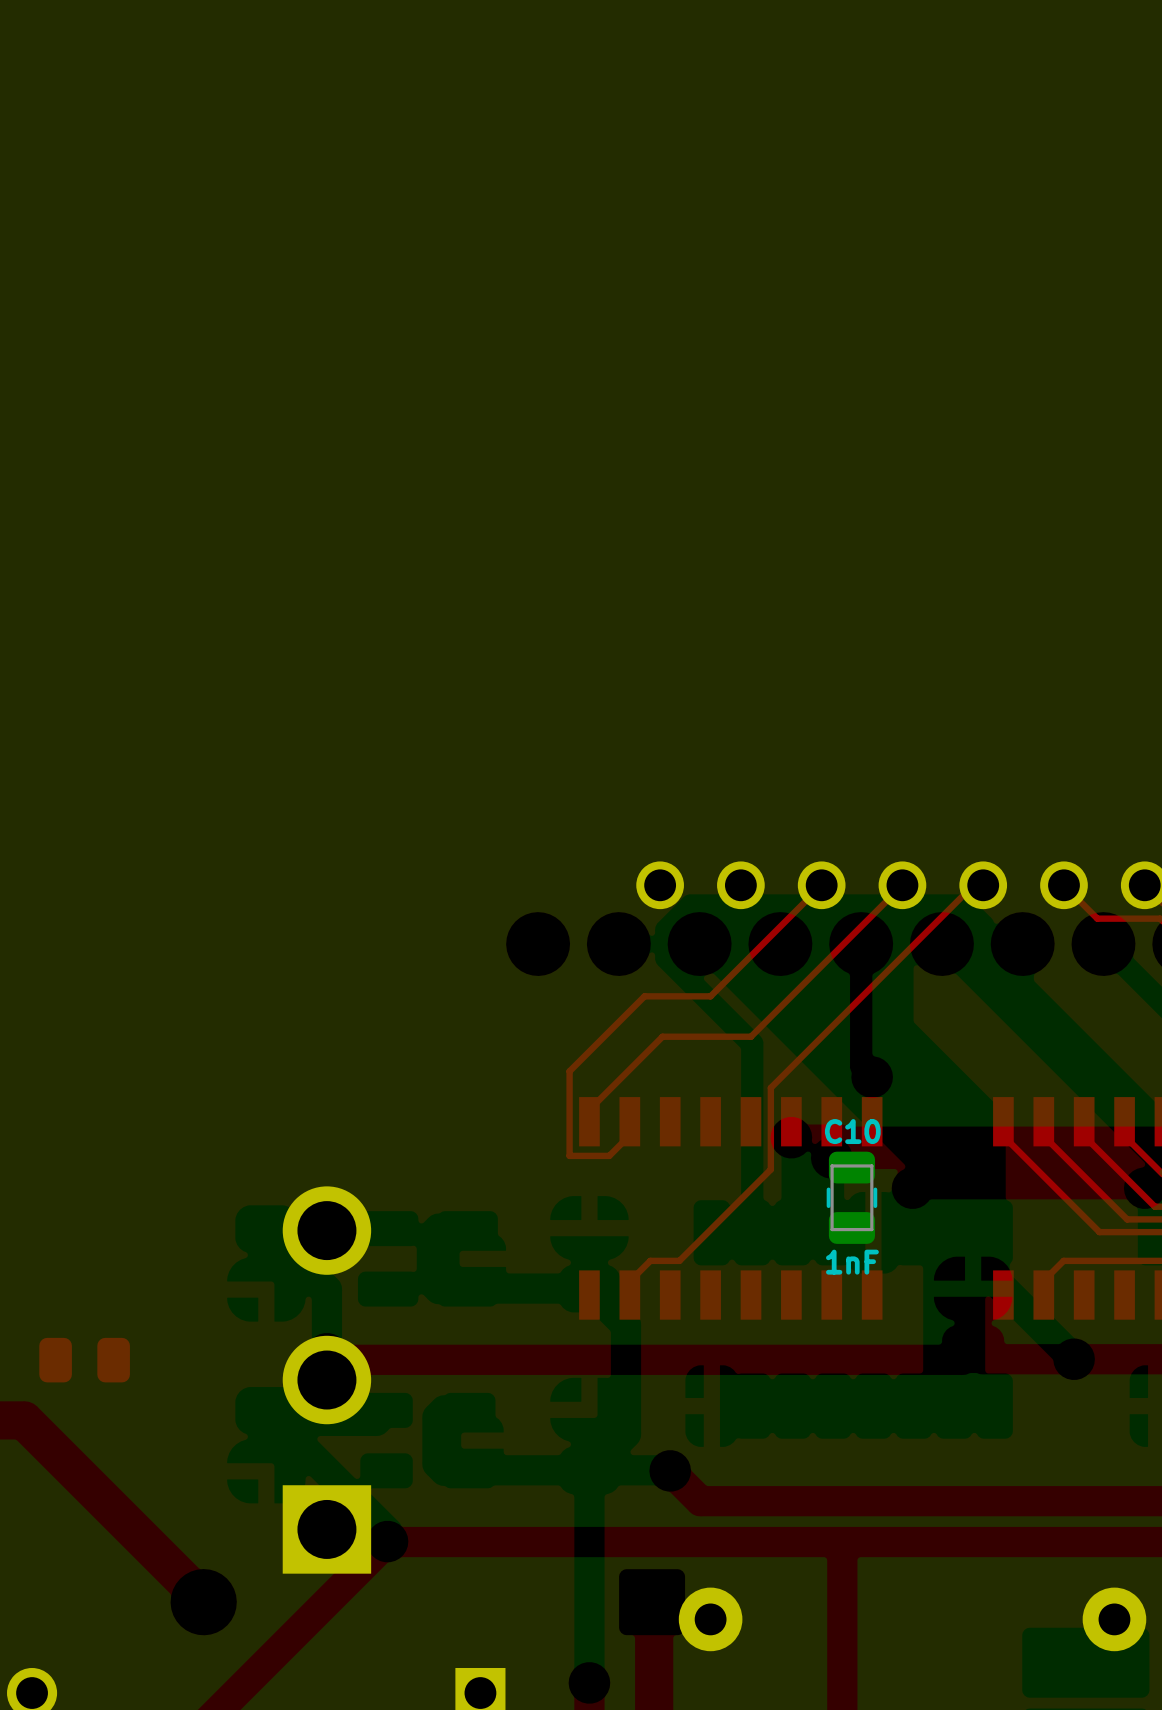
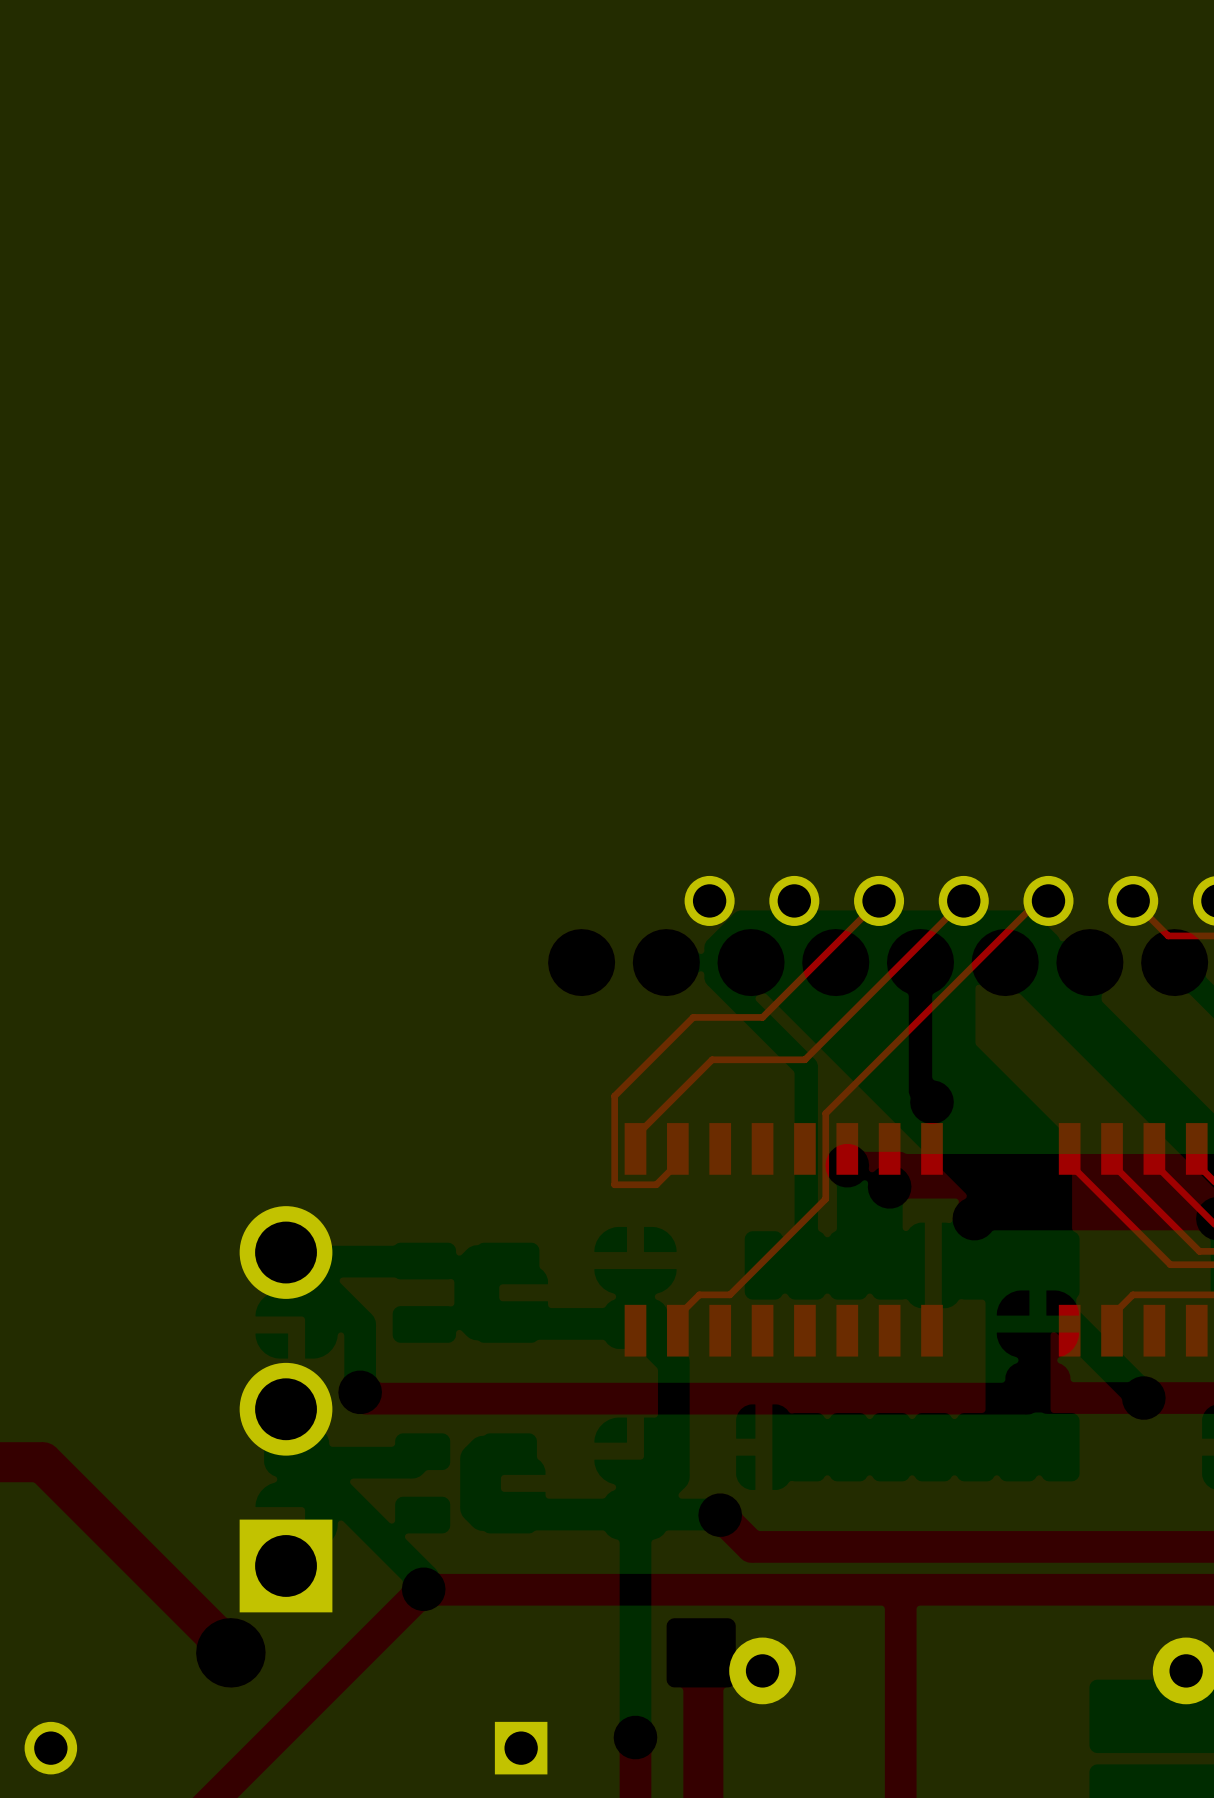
C10: (851, 1197) -> none
part: (84, 1360) -> none
part position: (326, 1380) -> (286, 1409)

